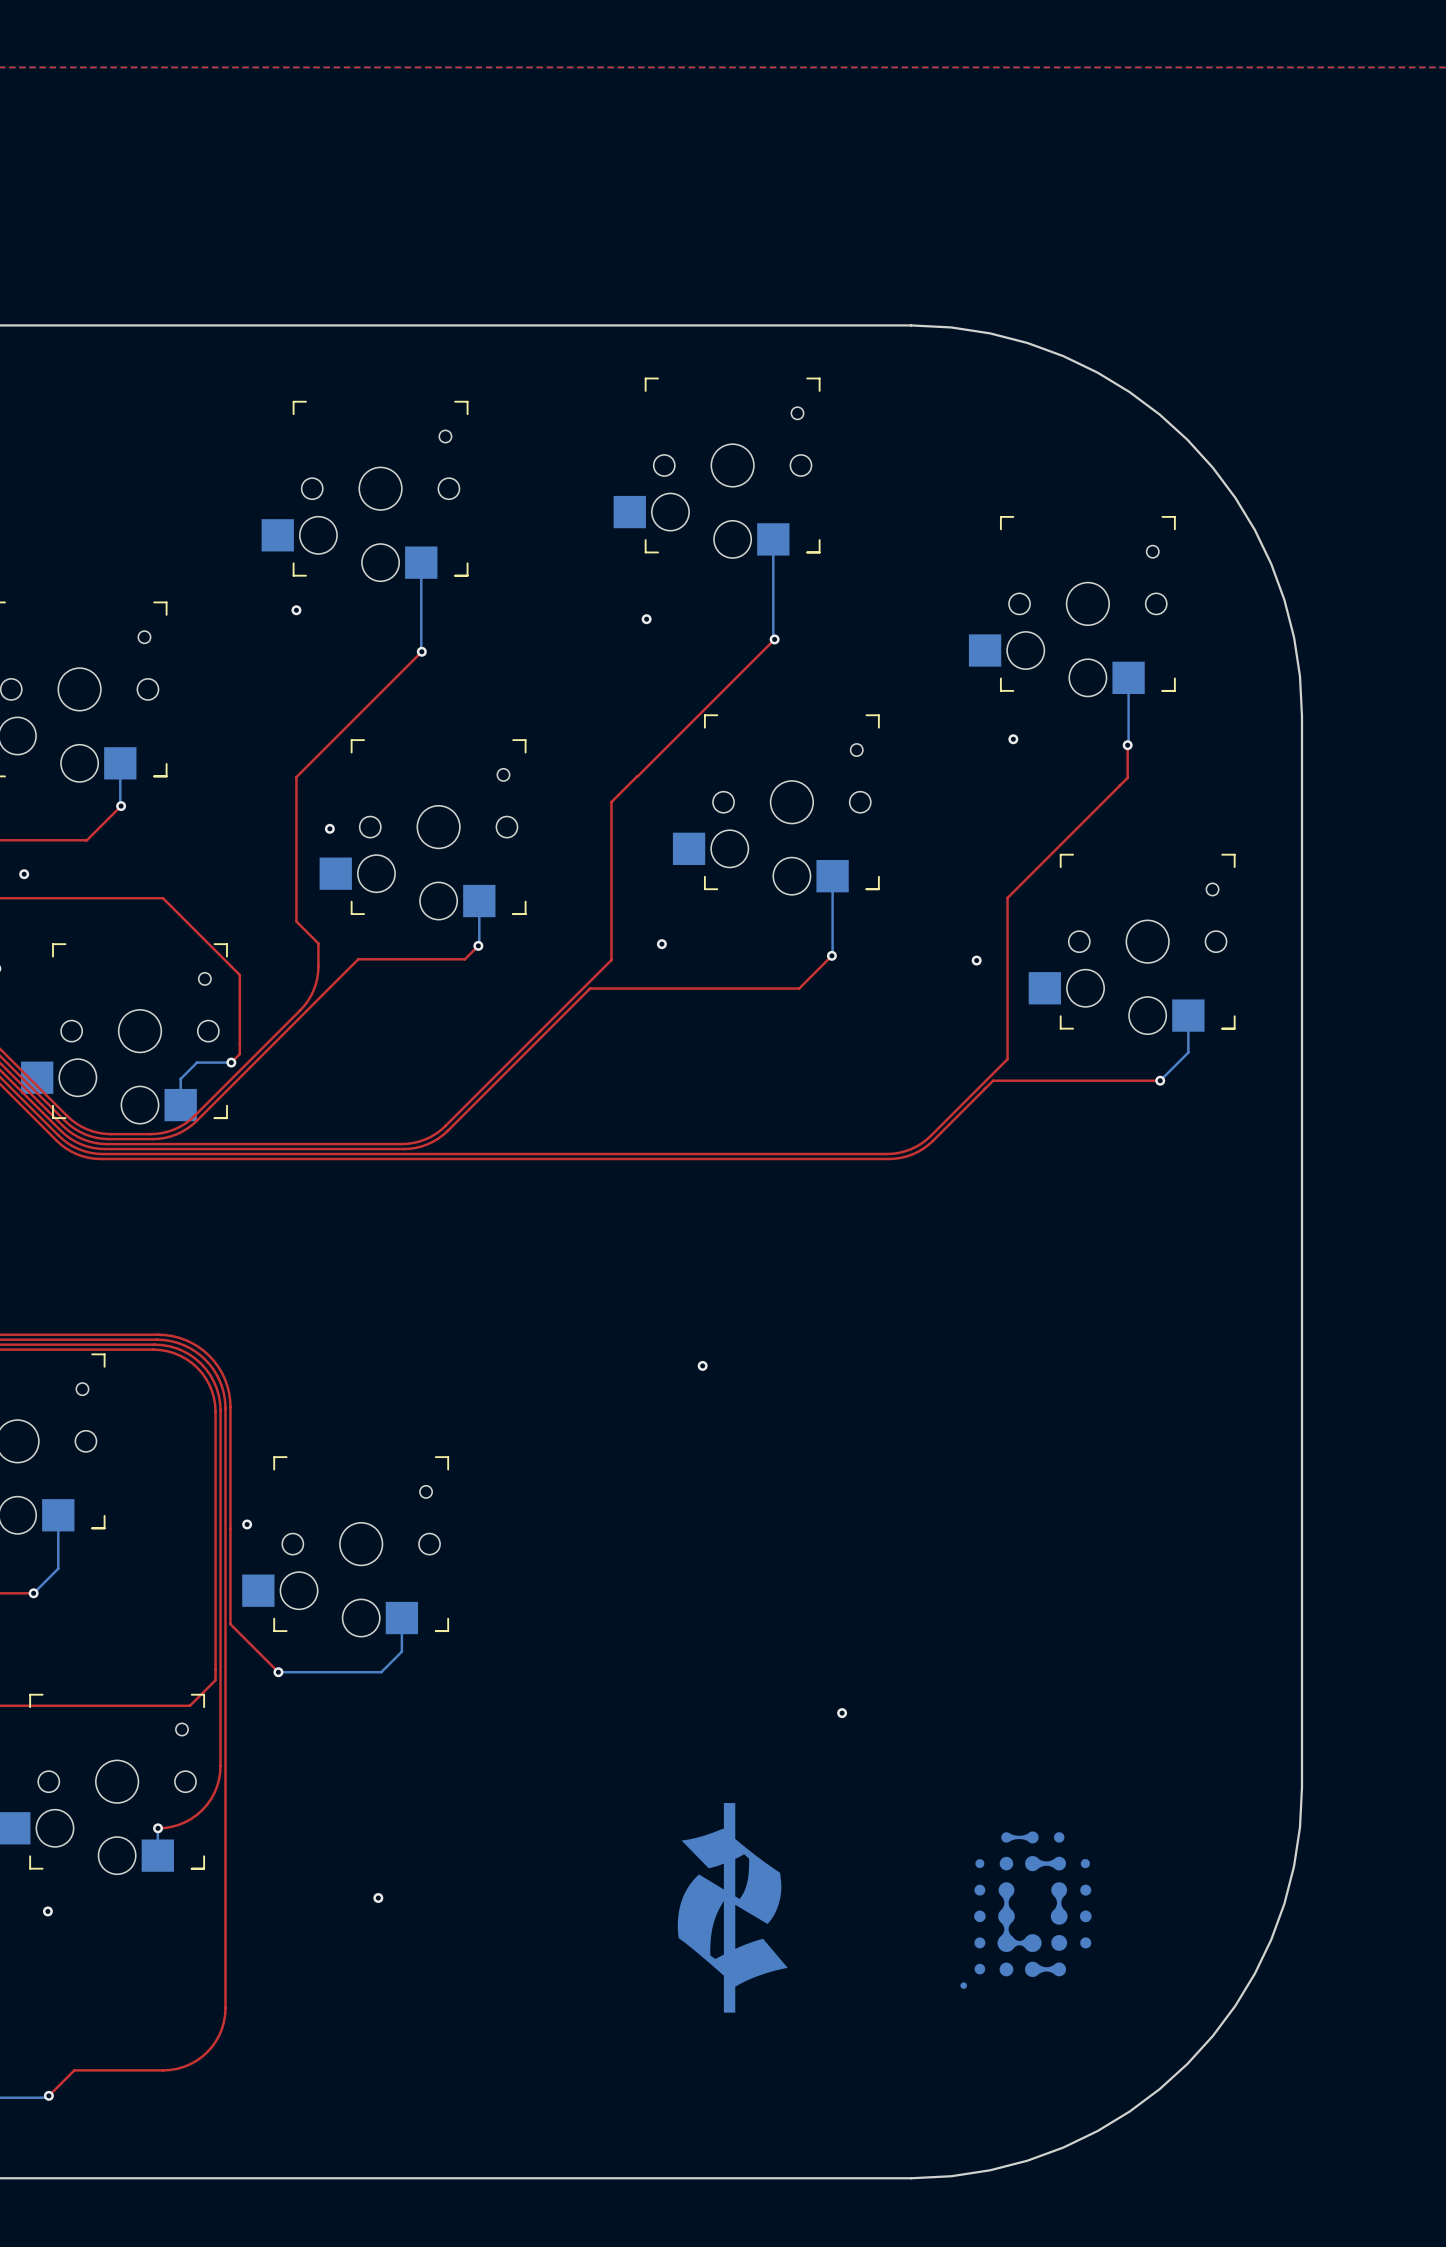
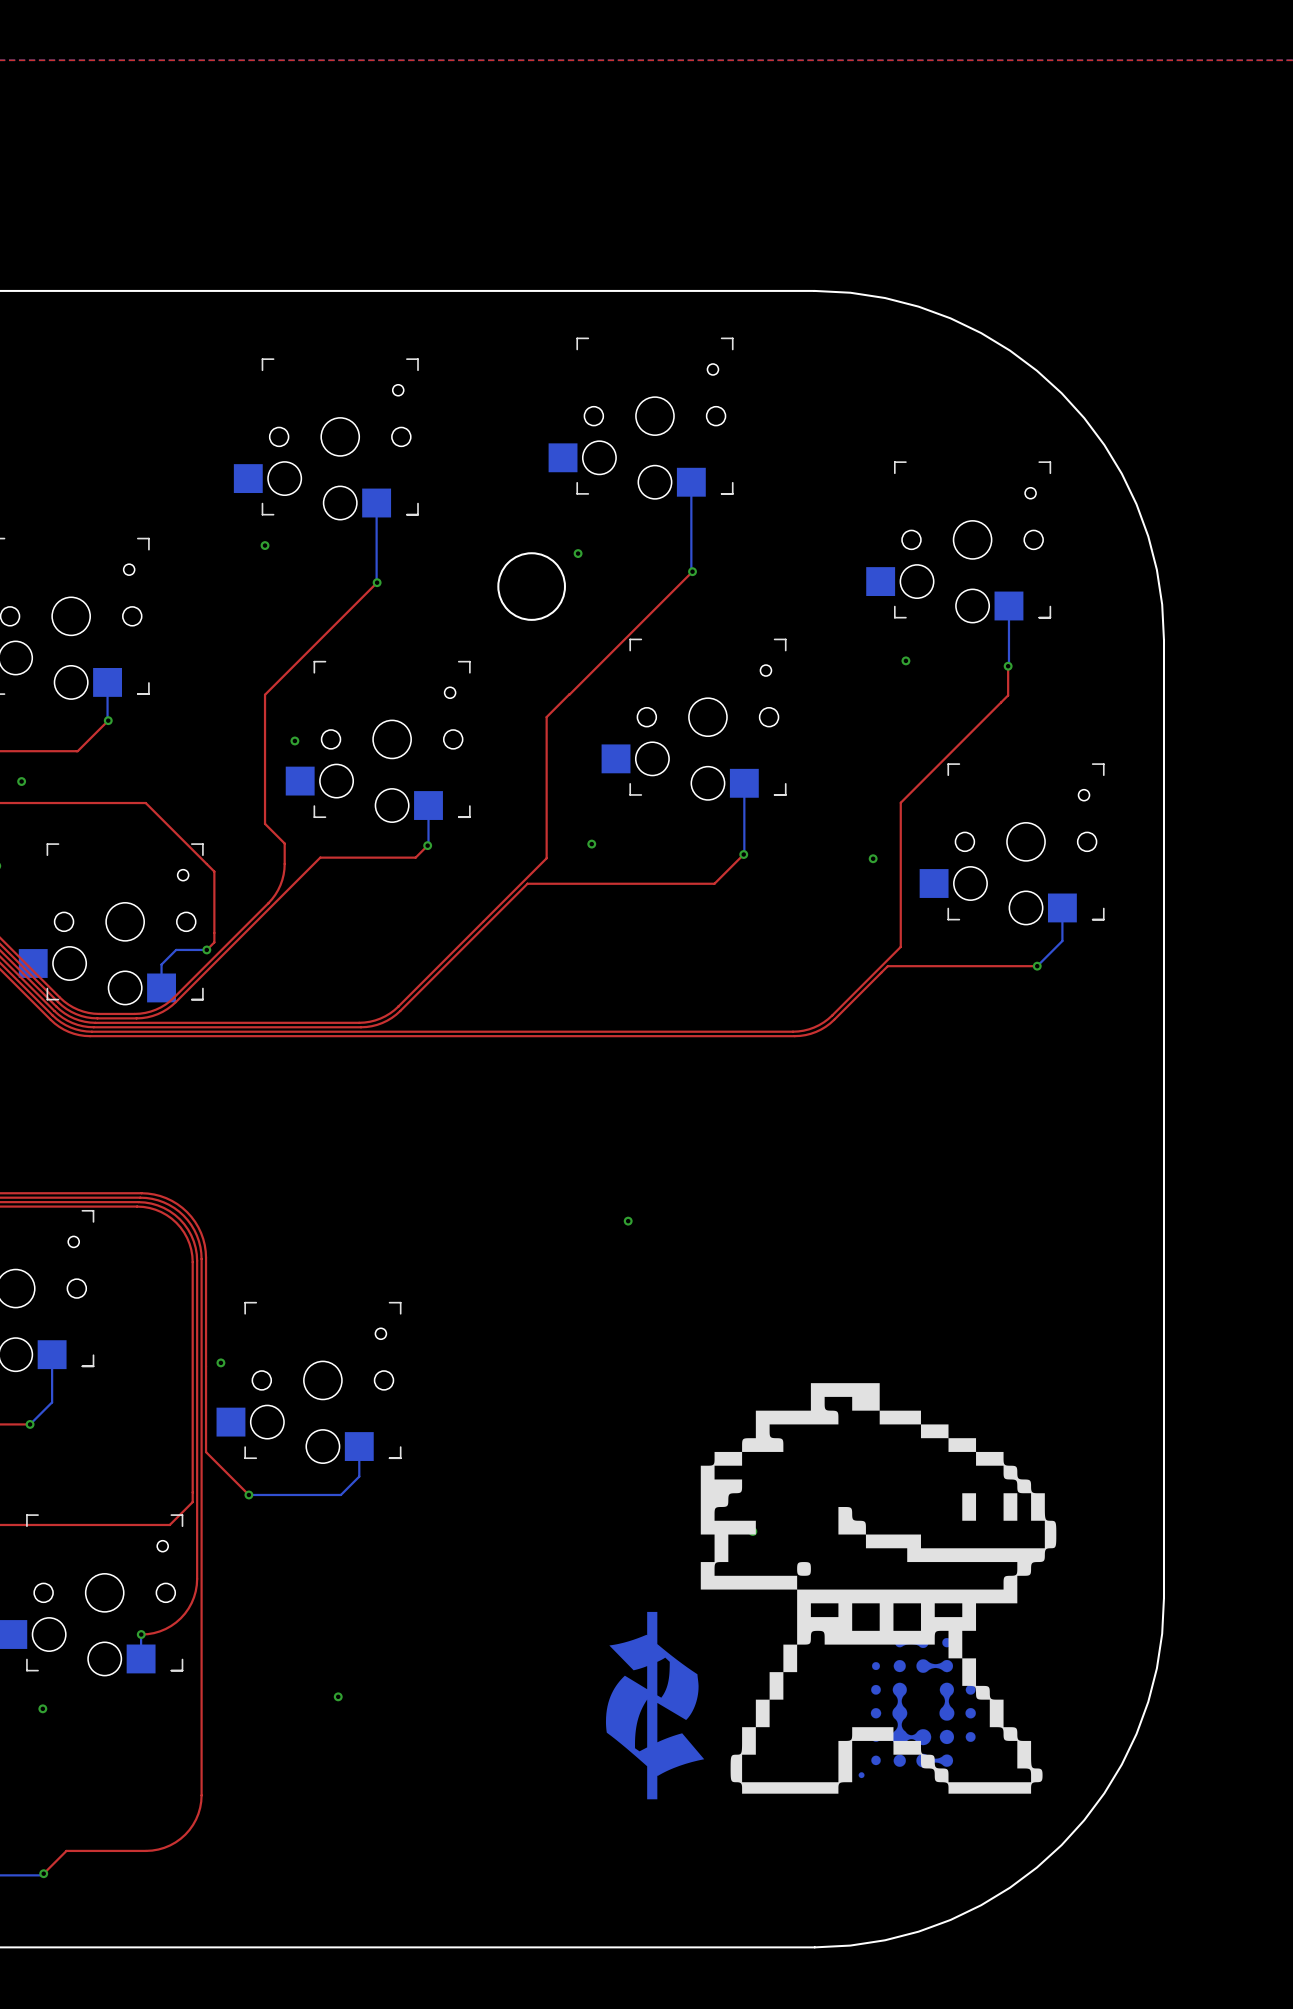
round board edge: none -> [497, 552, 566, 621]
drawing: none -> [700, 1383, 1057, 1794]

